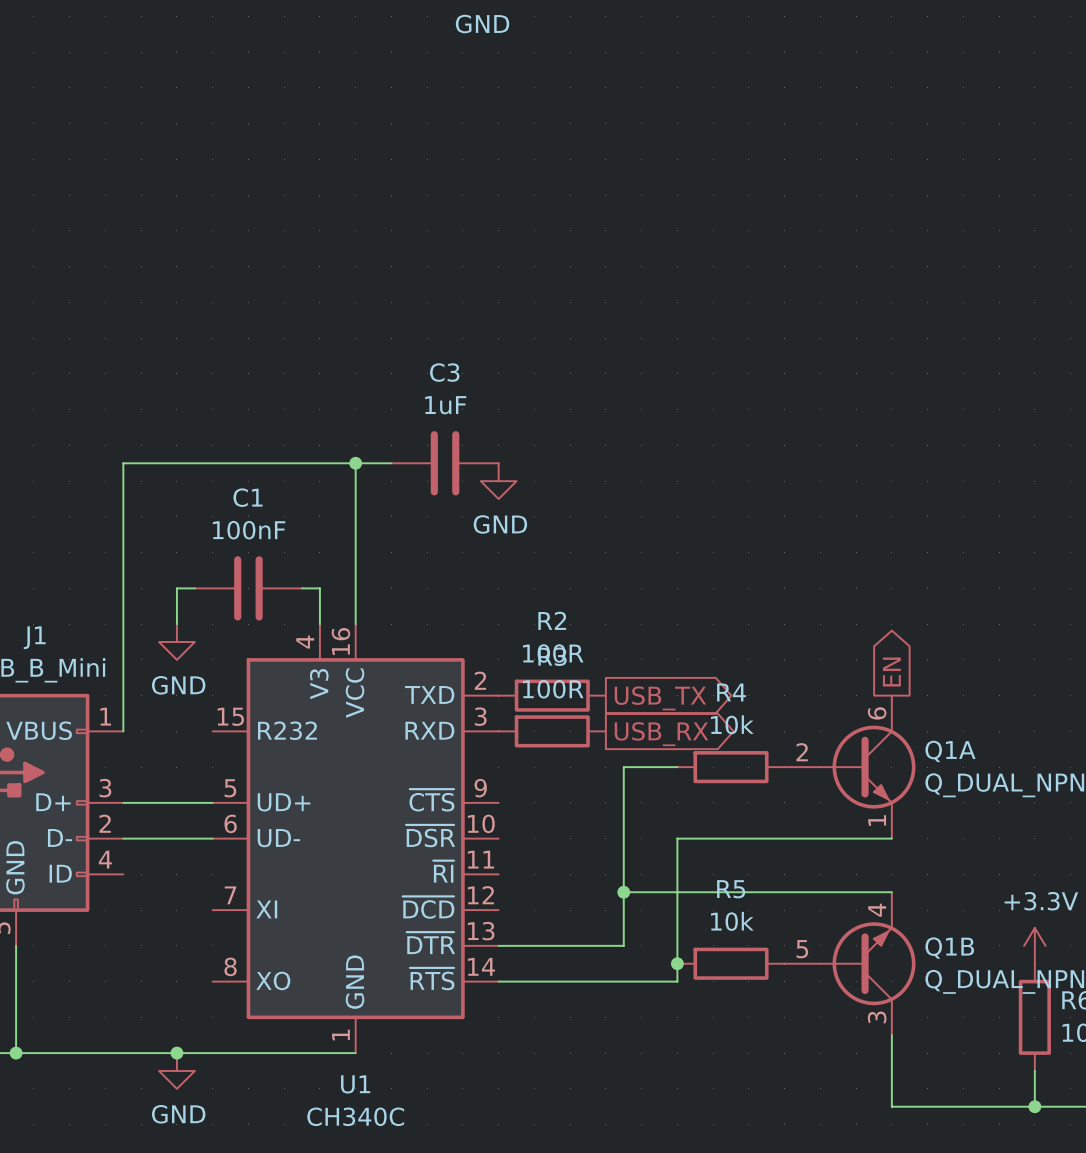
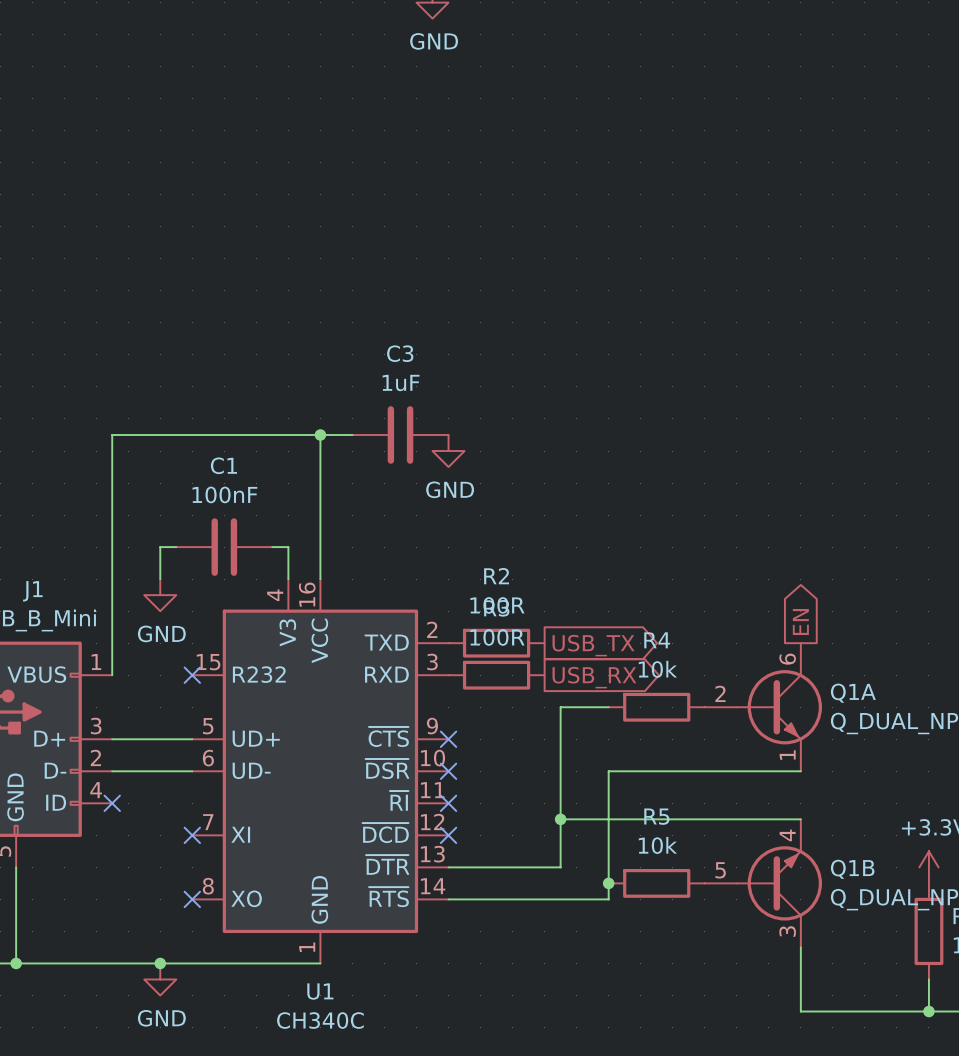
no-connect mark: none -> (192, 675)
no-connect mark: none -> (448, 739)
no-connect mark: none -> (448, 771)
no-connect mark: none -> (112, 803)
no-connect mark: none -> (448, 803)
no-connect mark: none -> (192, 835)
no-connect mark: none -> (448, 835)
no-connect mark: none -> (192, 899)

